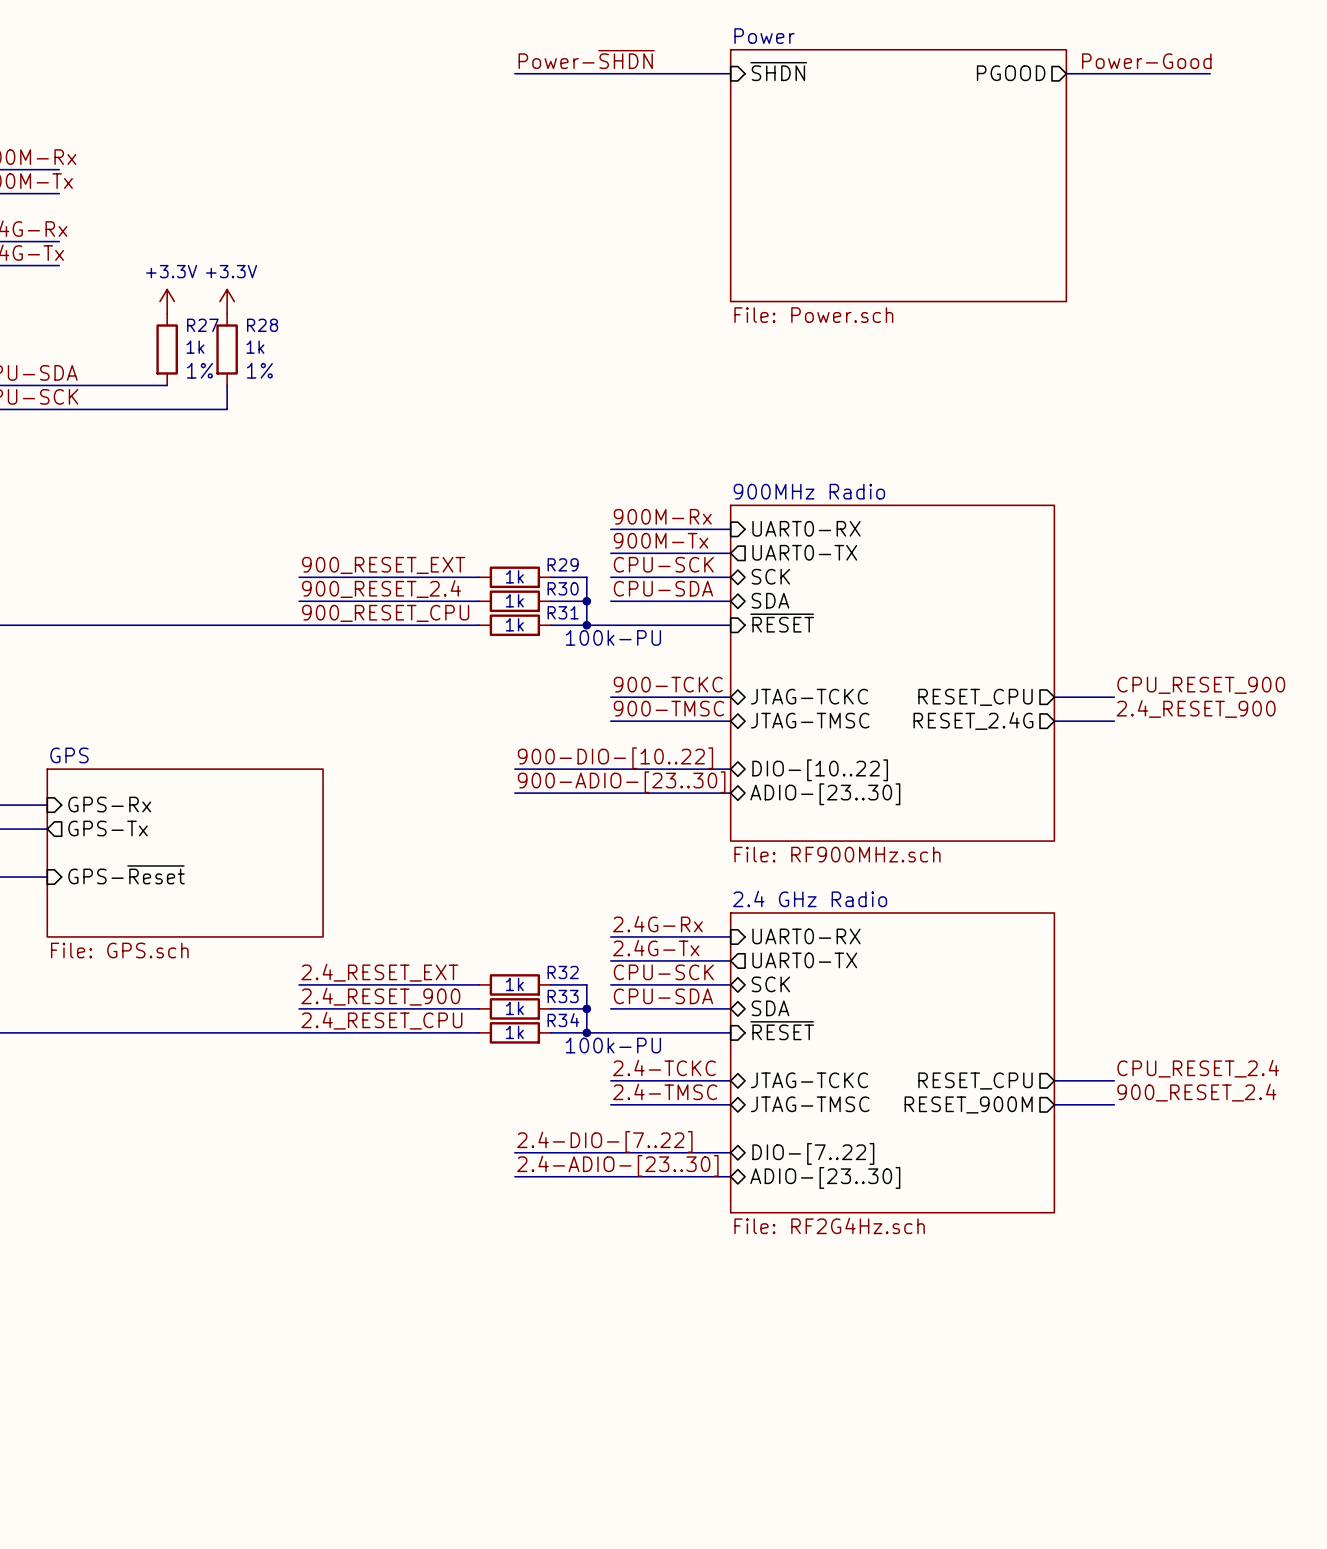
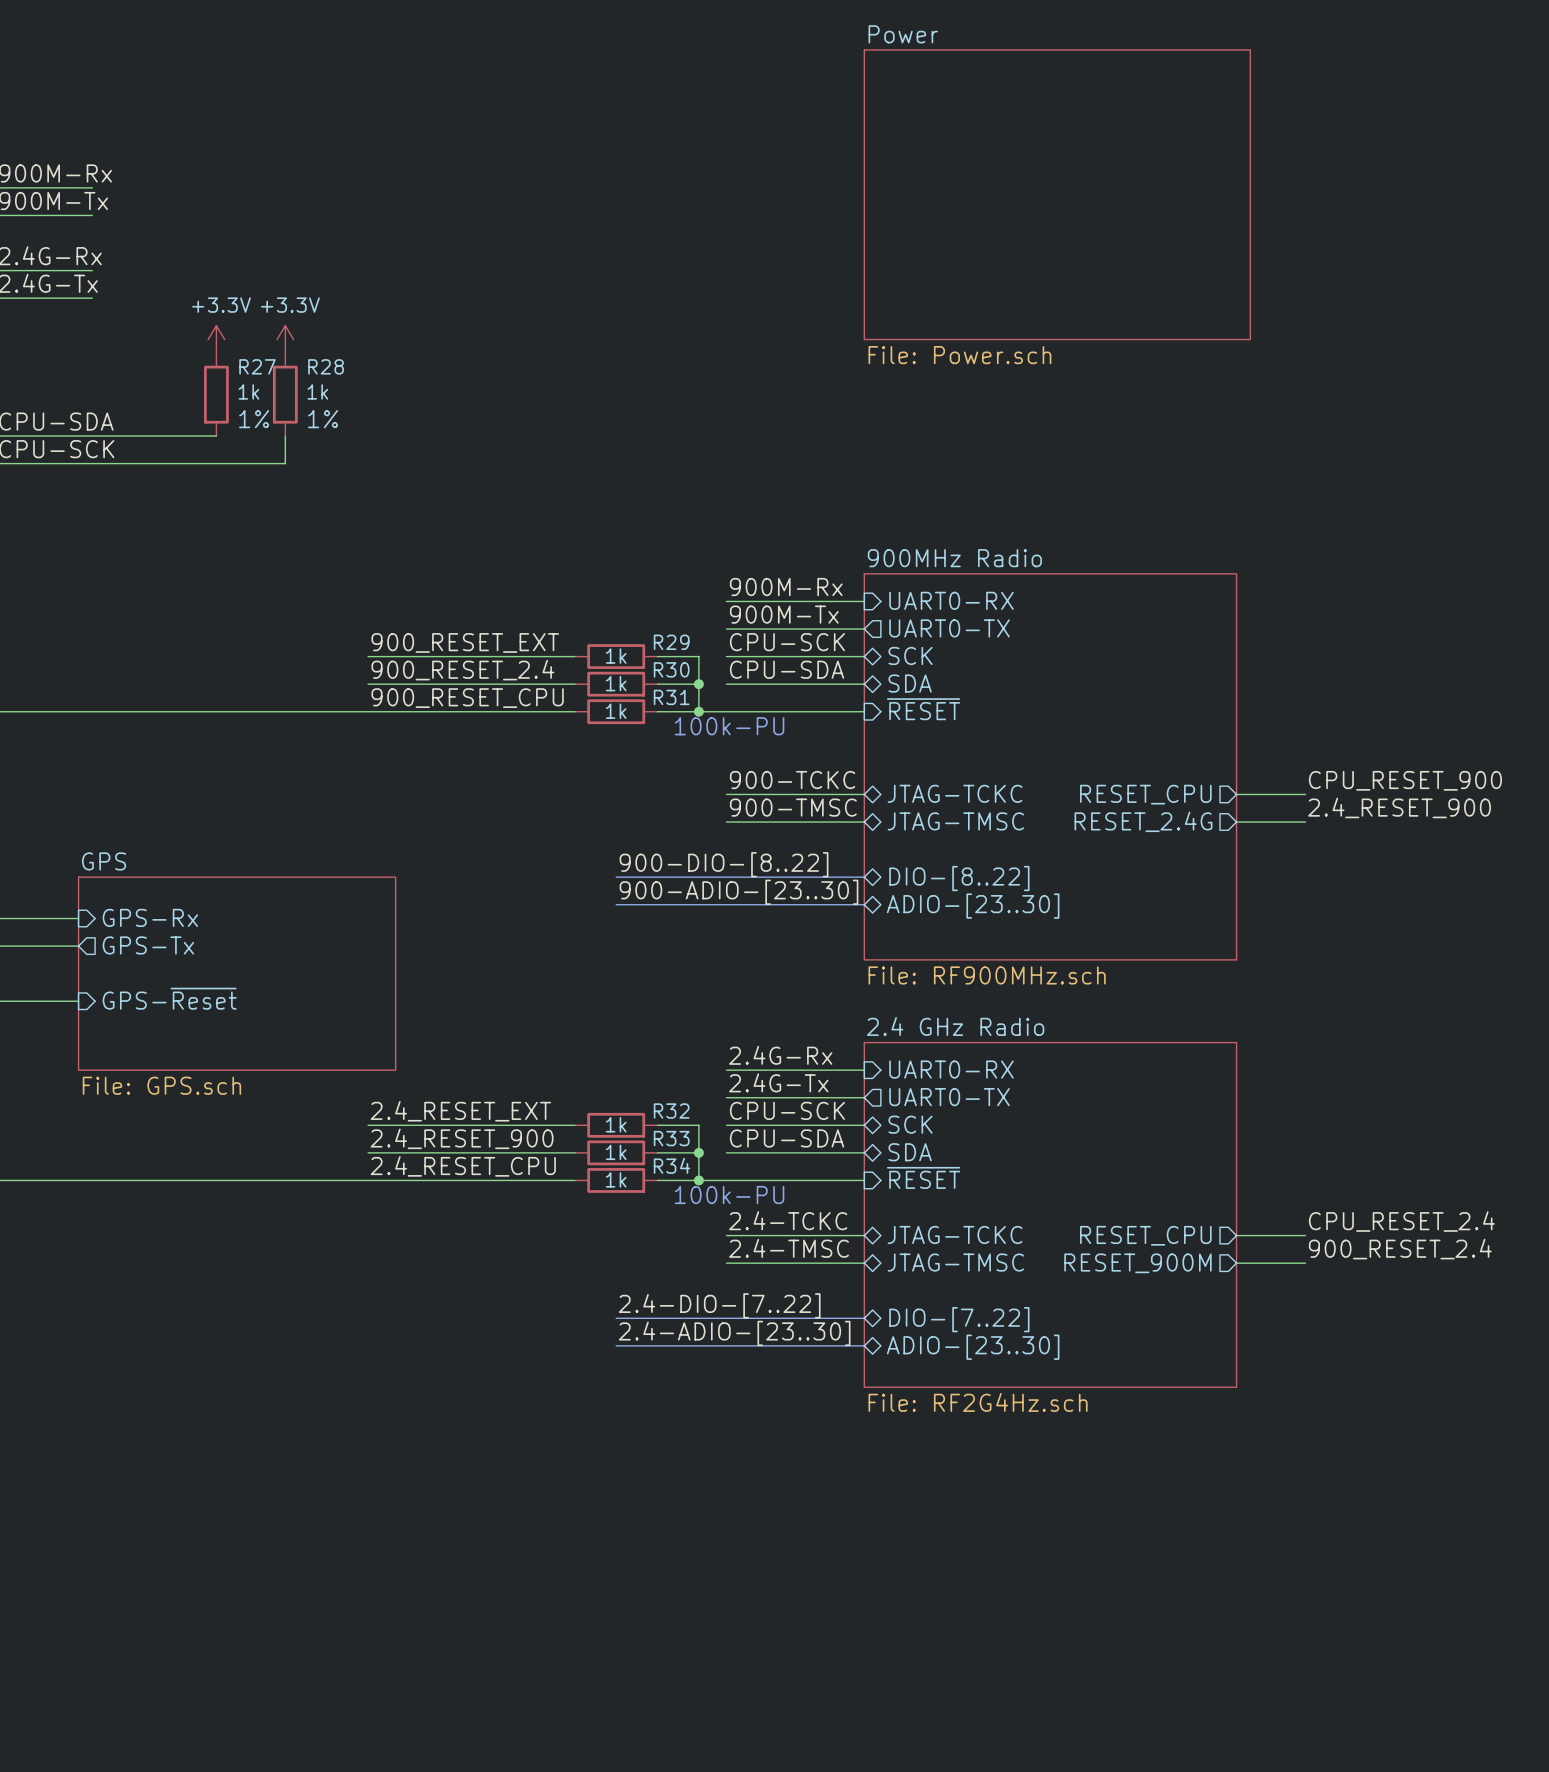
label: Power-~{SHDN} (586, 59) -> none
label: Power-Good (1146, 61) -> none
sheet pin: ~{SHDN} (778, 71) -> none
wire: (514, 73) (730, 73) -> none
sheet pin: PGOOD (1011, 73) -> none
wire: (1066, 73) (1210, 73) -> none
label: 900-DIO-[10..22] (615, 758) -> 900-DIO-[8..22] (724, 864)
sheet pin: DIO-[10..22] (820, 770) -> DIO-[8..22] (959, 878)

